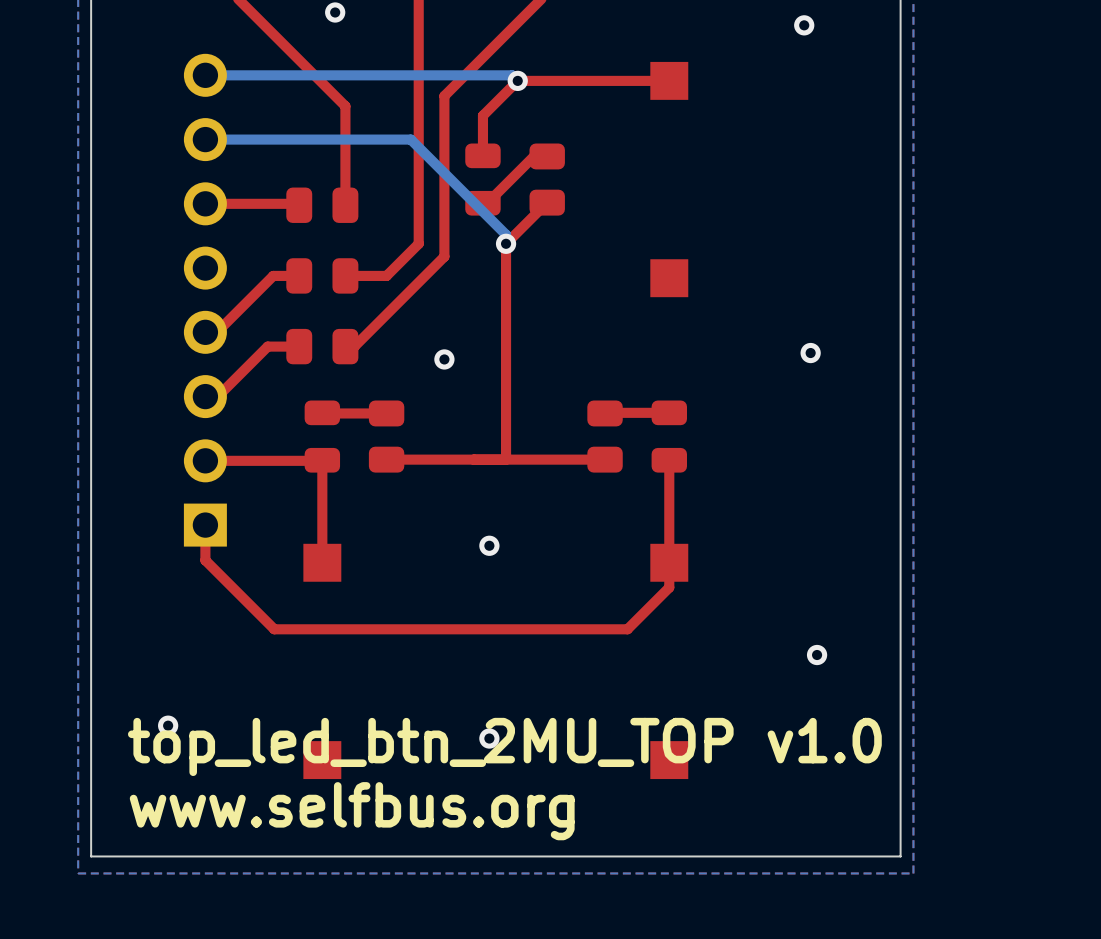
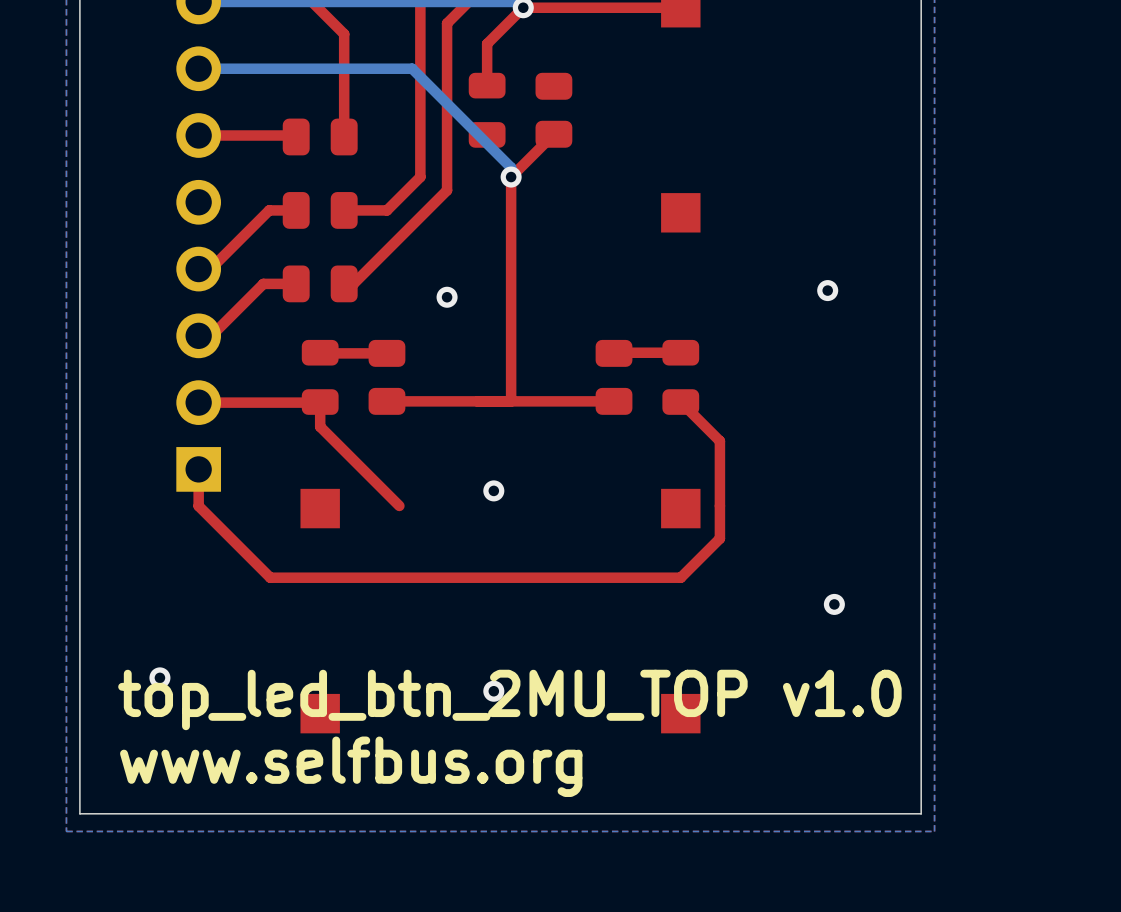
top track: (547, 156) (533, 156) (487, 203) (482, 203) -> none
top track: (669, 460) (669, 587) (627, 629) -> (680, 402) (719, 441) (719, 538) (680, 577) (637, 577)
top track: (322, 484) (322, 562) -> (320, 426) (399, 505)

